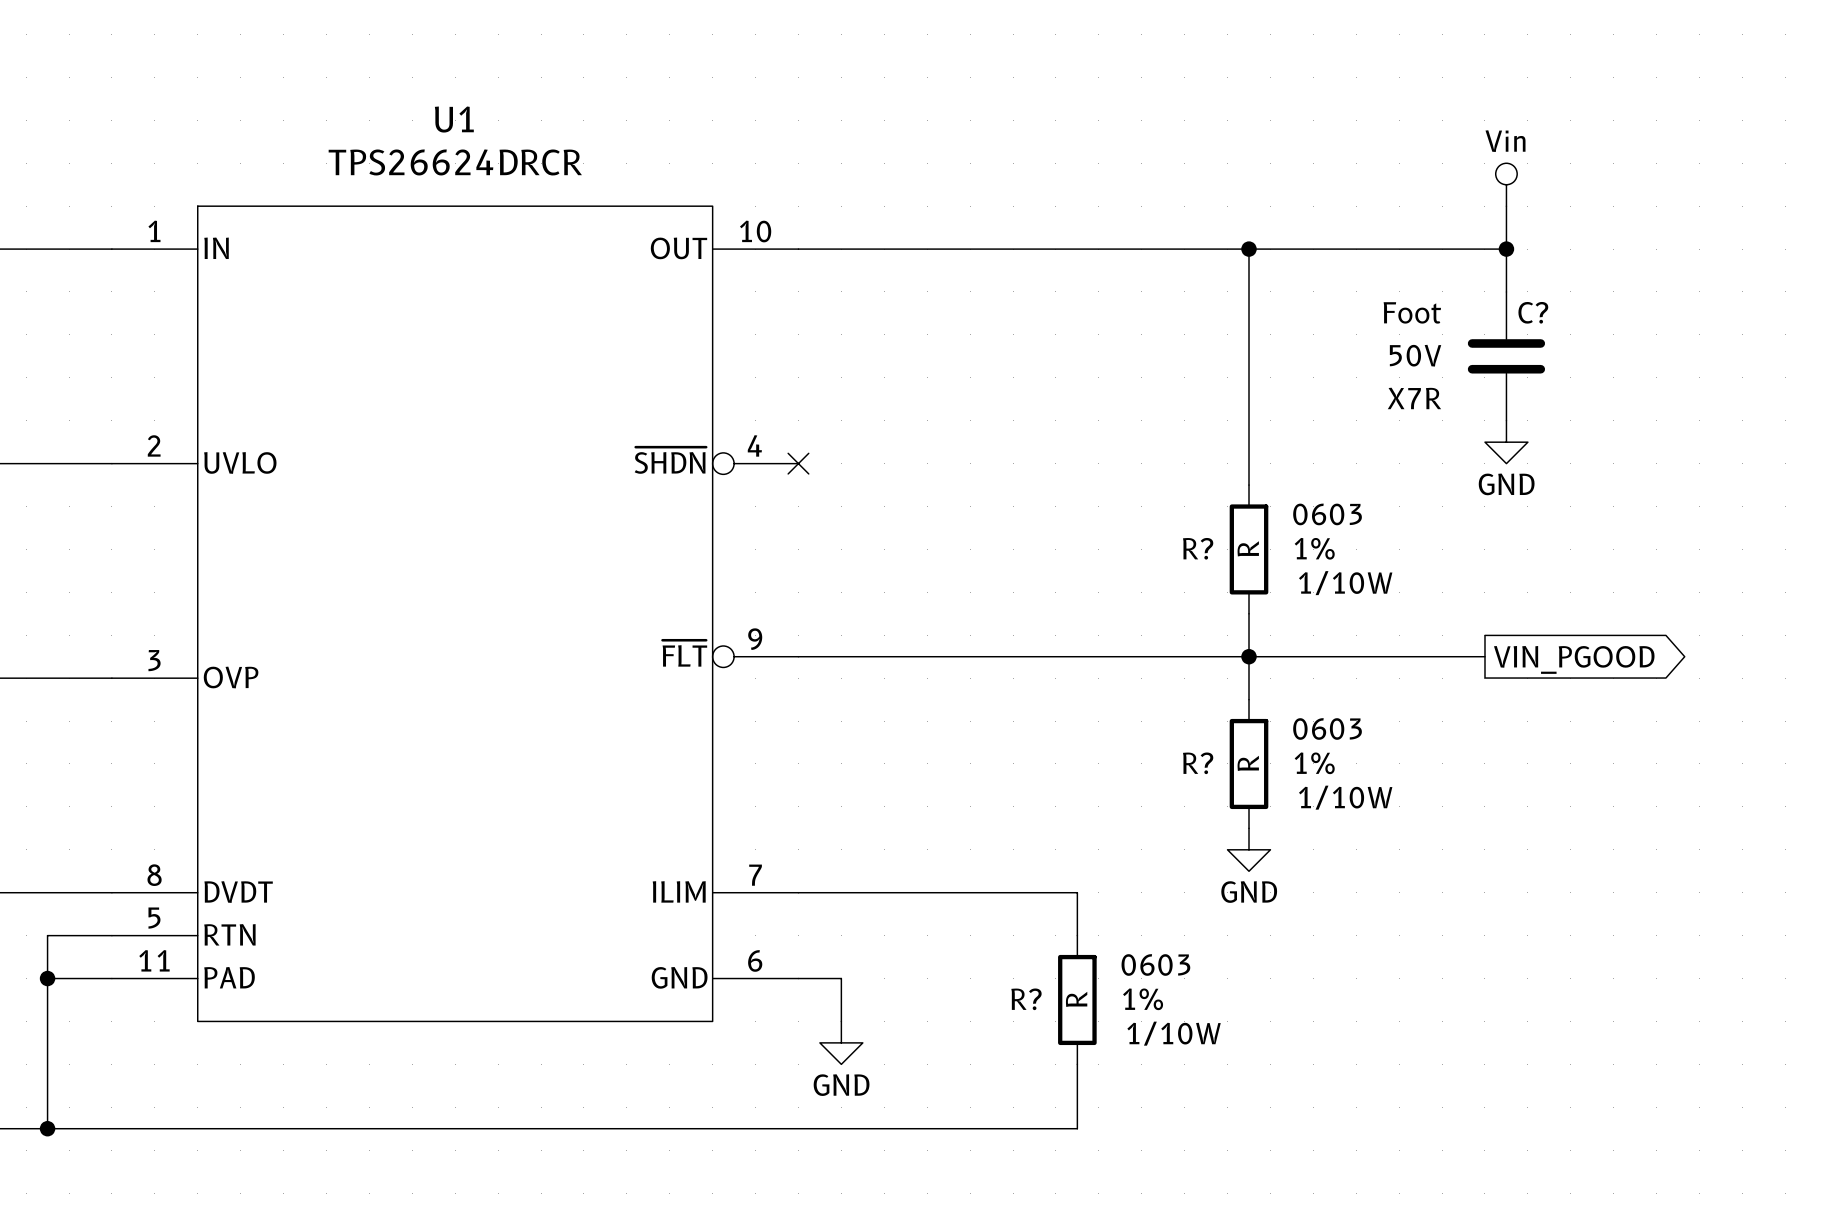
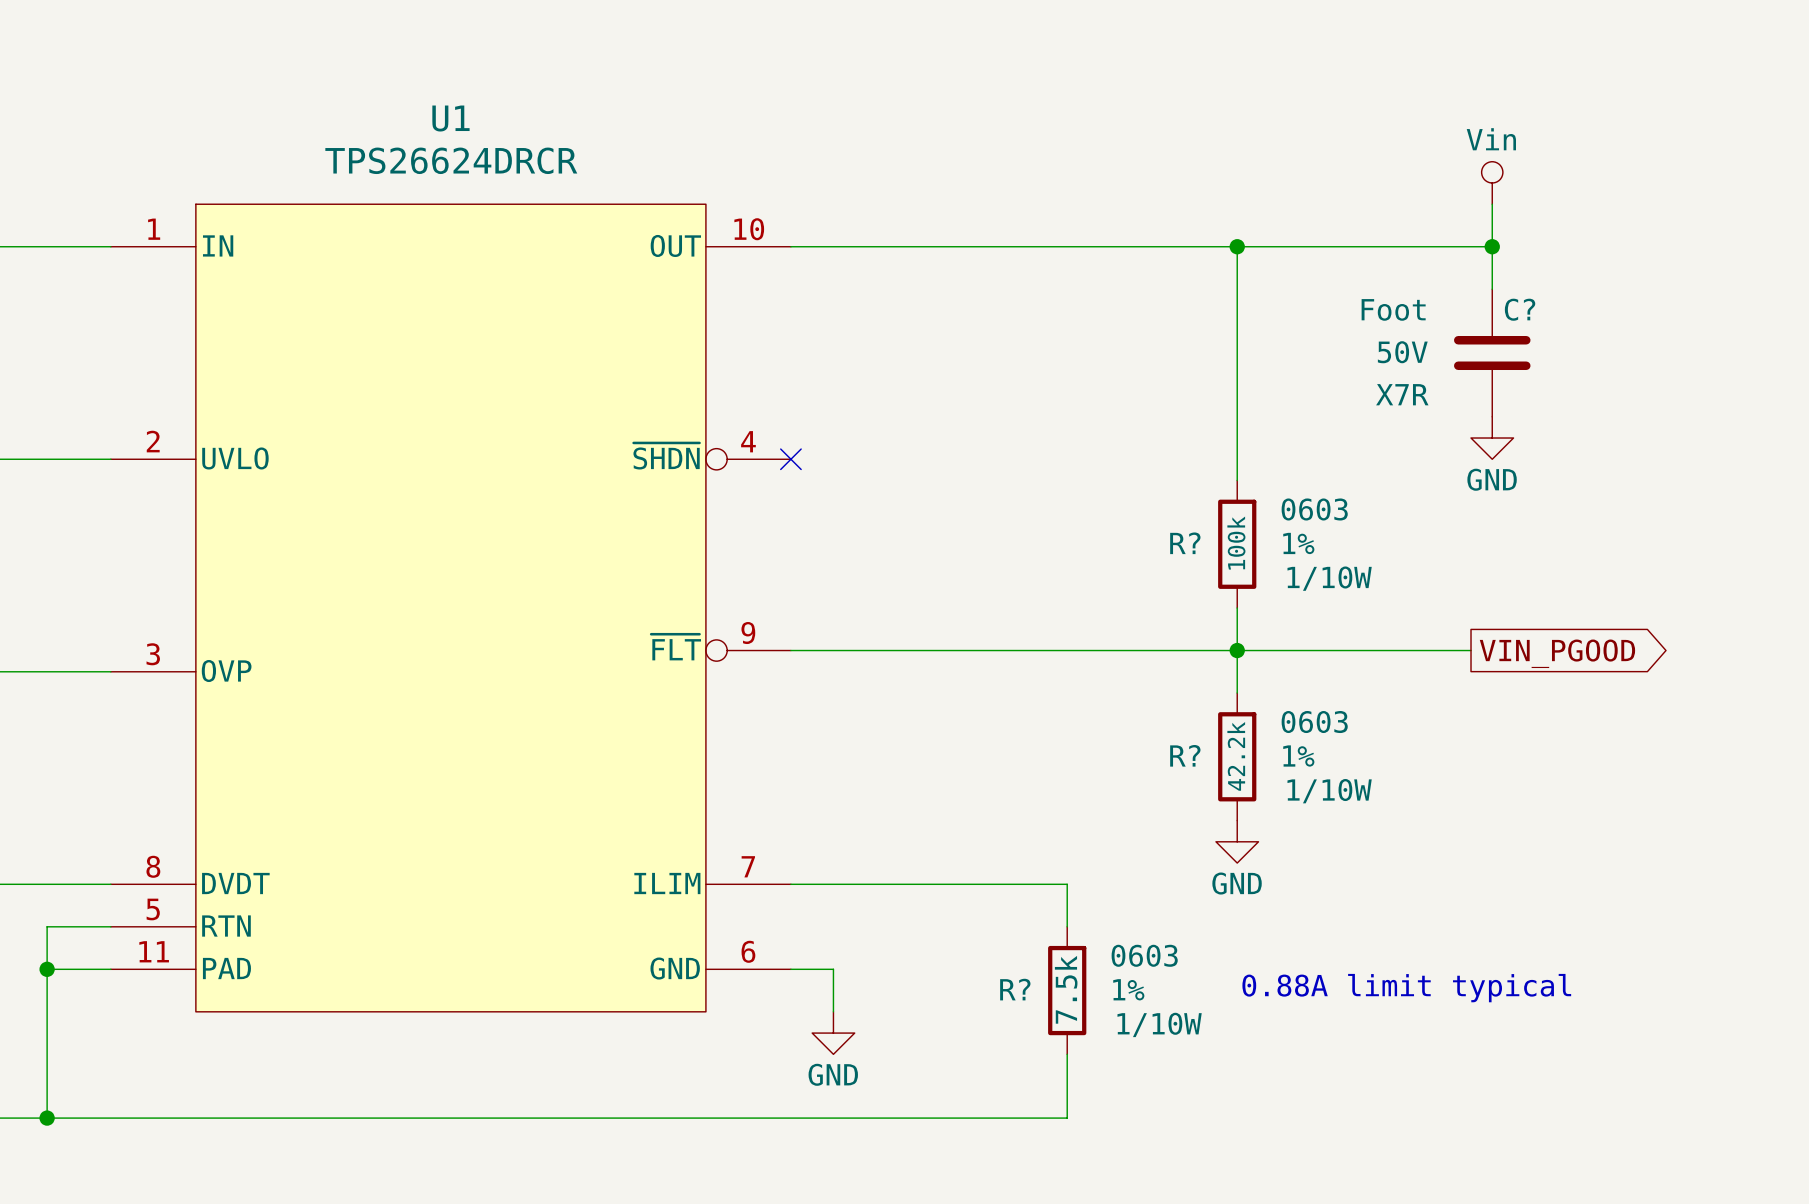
R? value: R (1248, 548) -> 100k (1236, 543)
R? value: R (1248, 763) -> 42.2k (1236, 756)
text: none -> 0.88A limit typical (1406, 988)
R? value: R (1076, 999) -> 7.5k (1066, 989)

